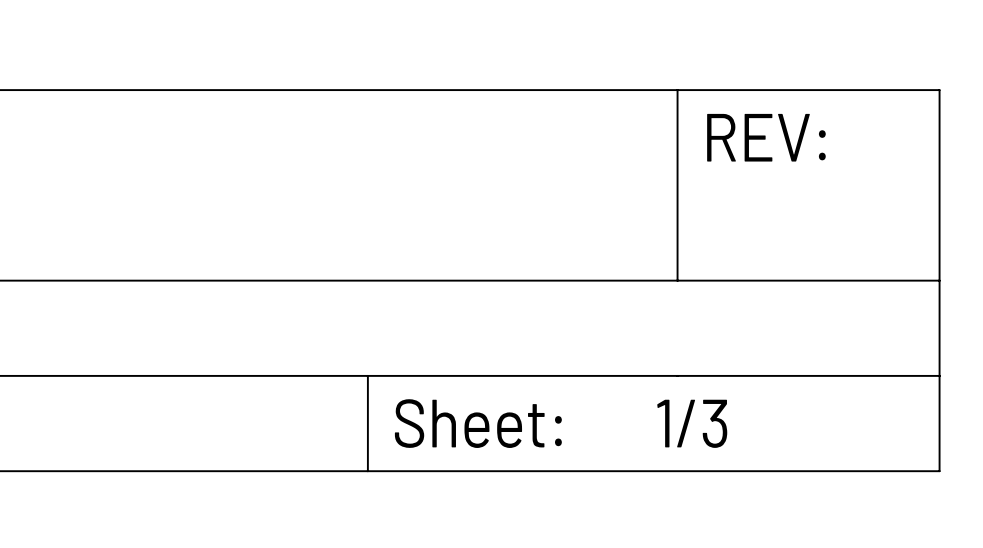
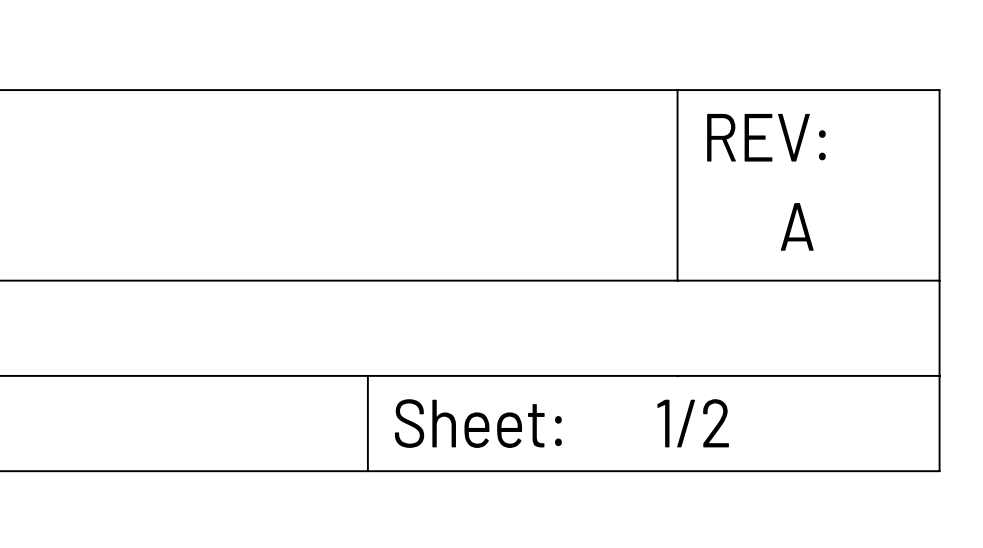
part text: none -> A (797, 226)
part text: 1/3 (692, 423) -> 1/2 (693, 423)

